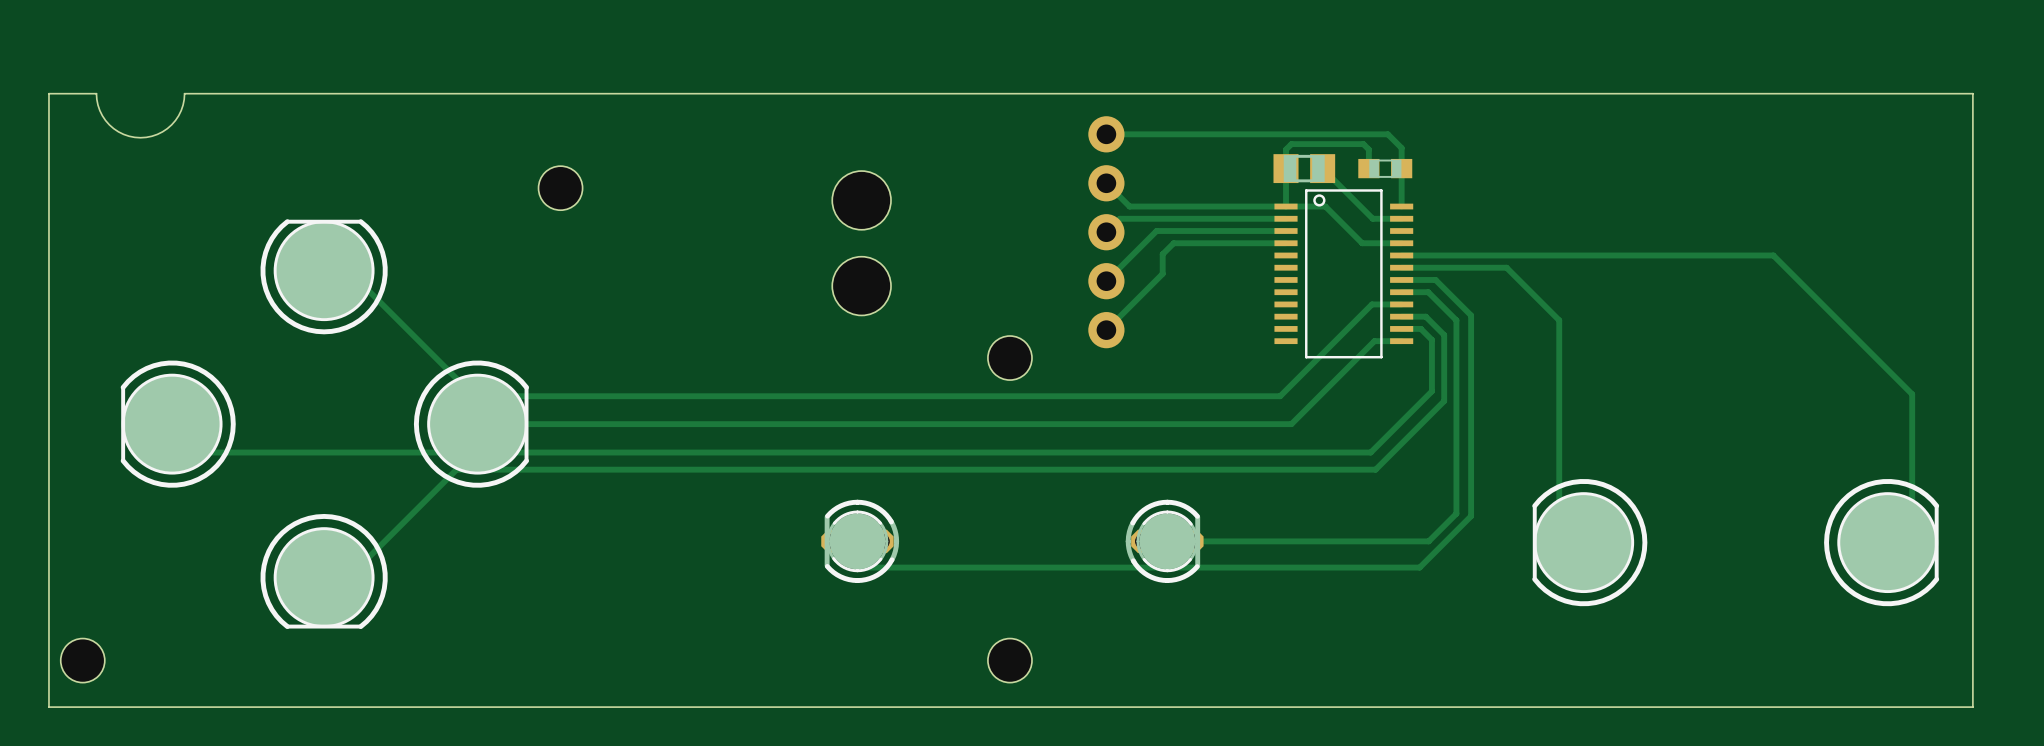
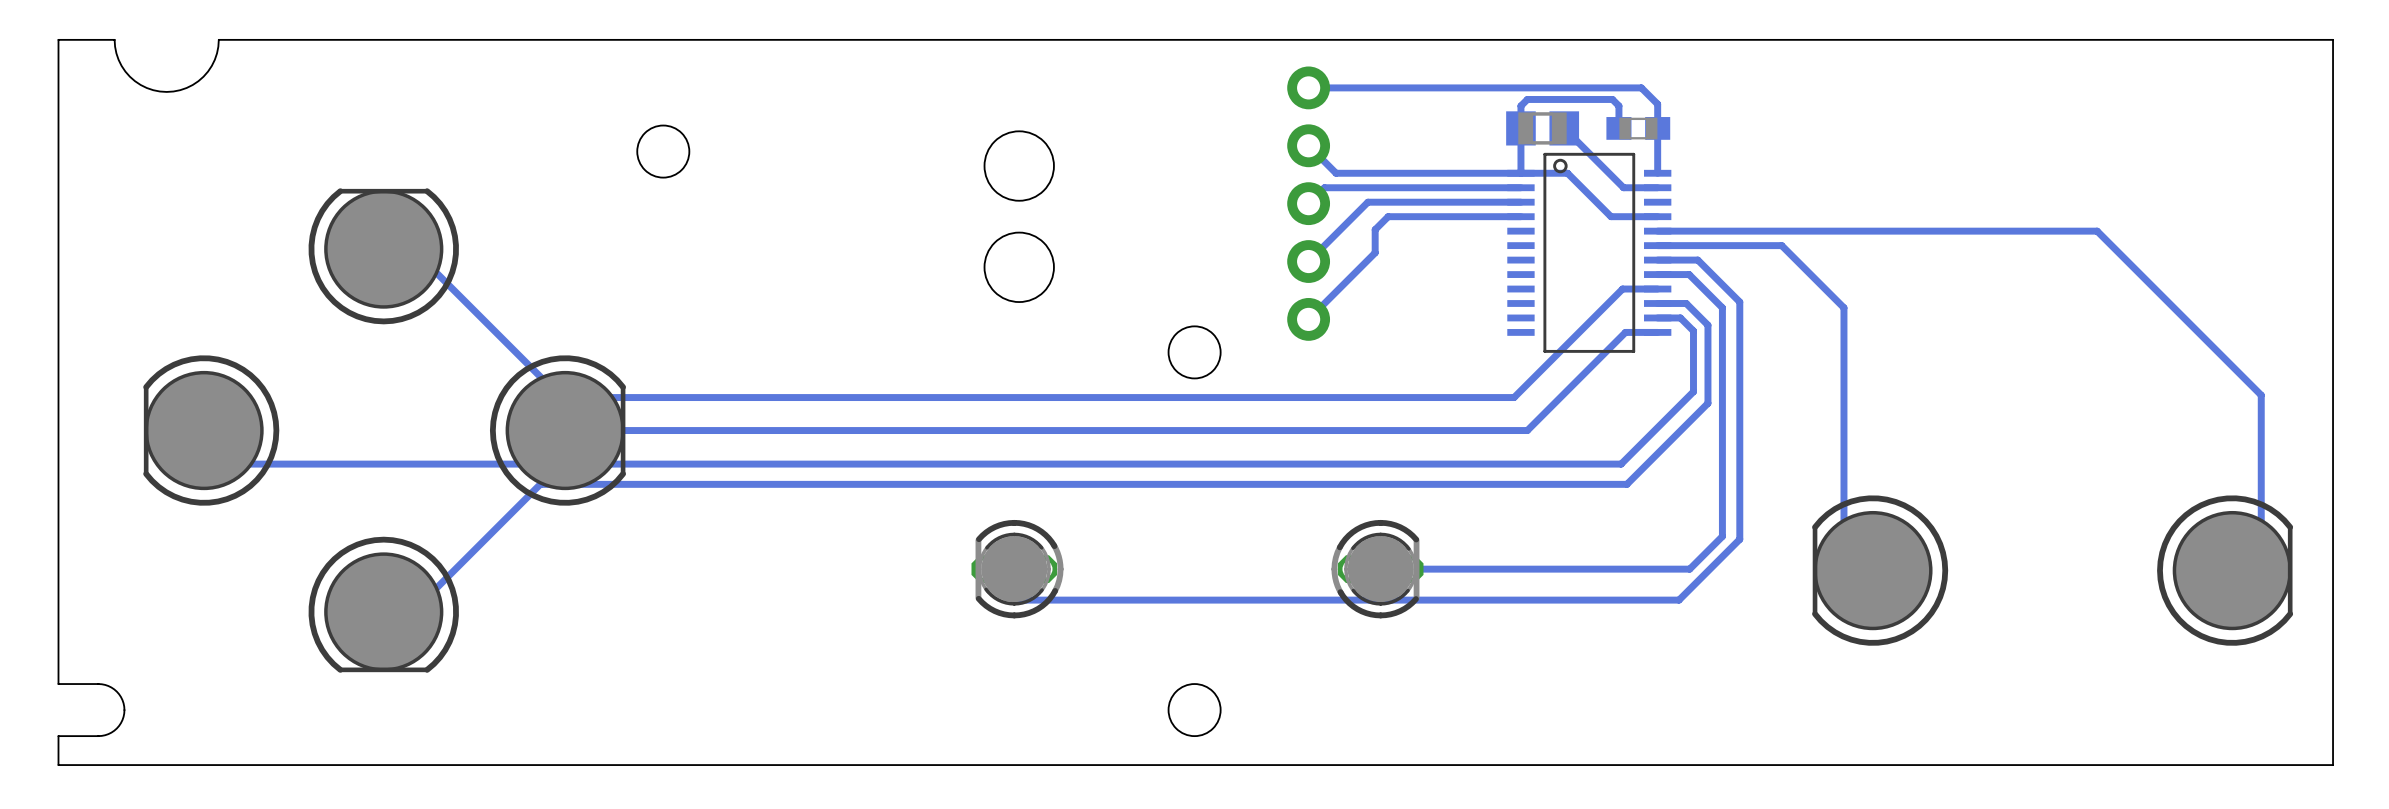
board edge: (48, 638) (48, 682) -> (58, 684) (98, 684) (108, 686) (120, 697) (124, 710) (120, 723) (108, 734) (98, 736) (58, 736)
hole: (82, 660) -> none

